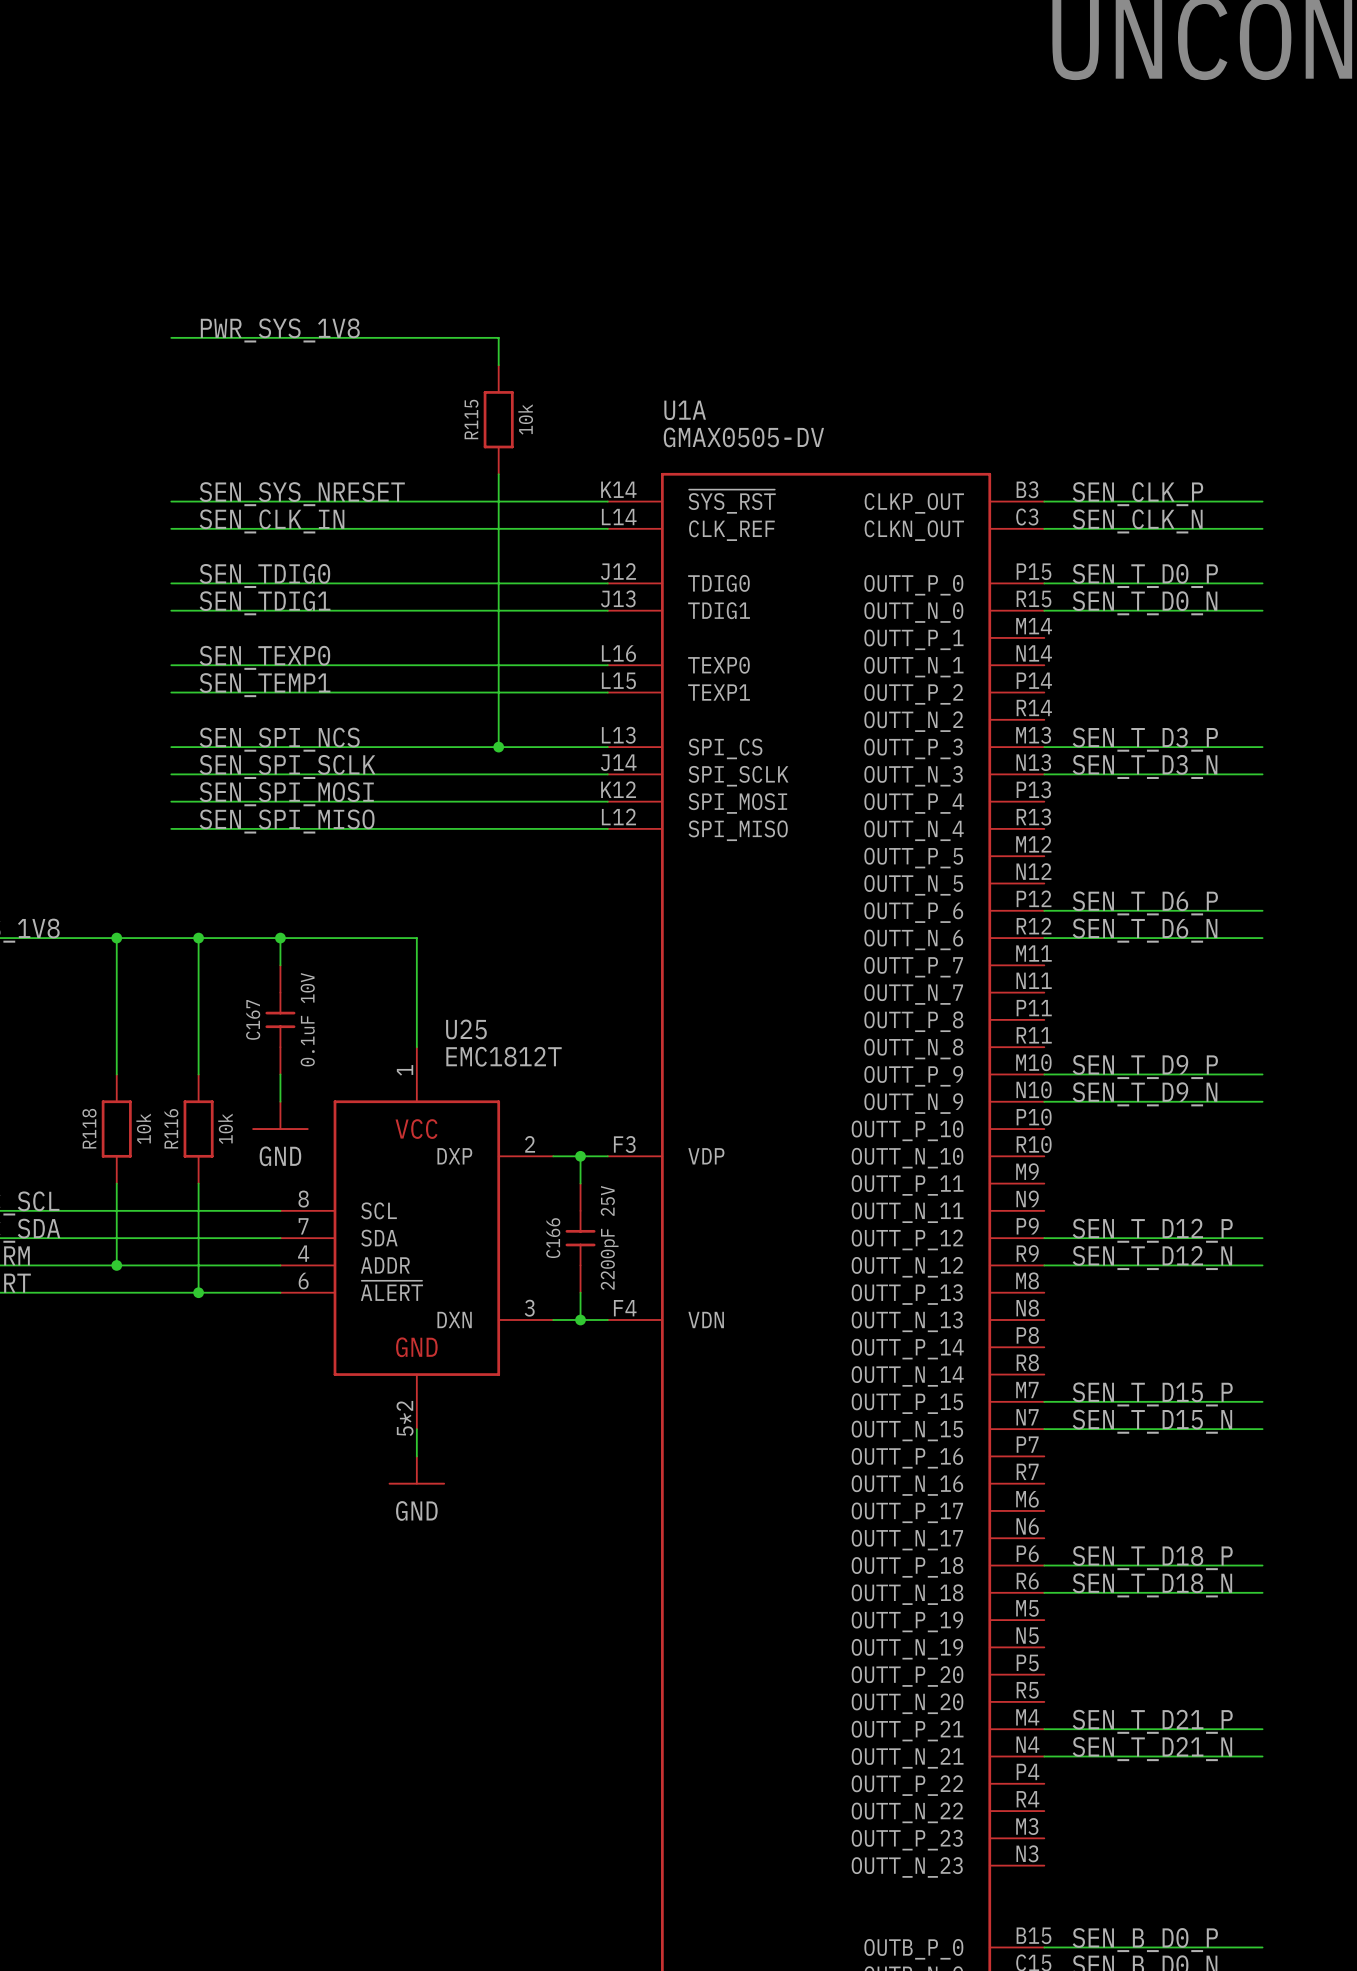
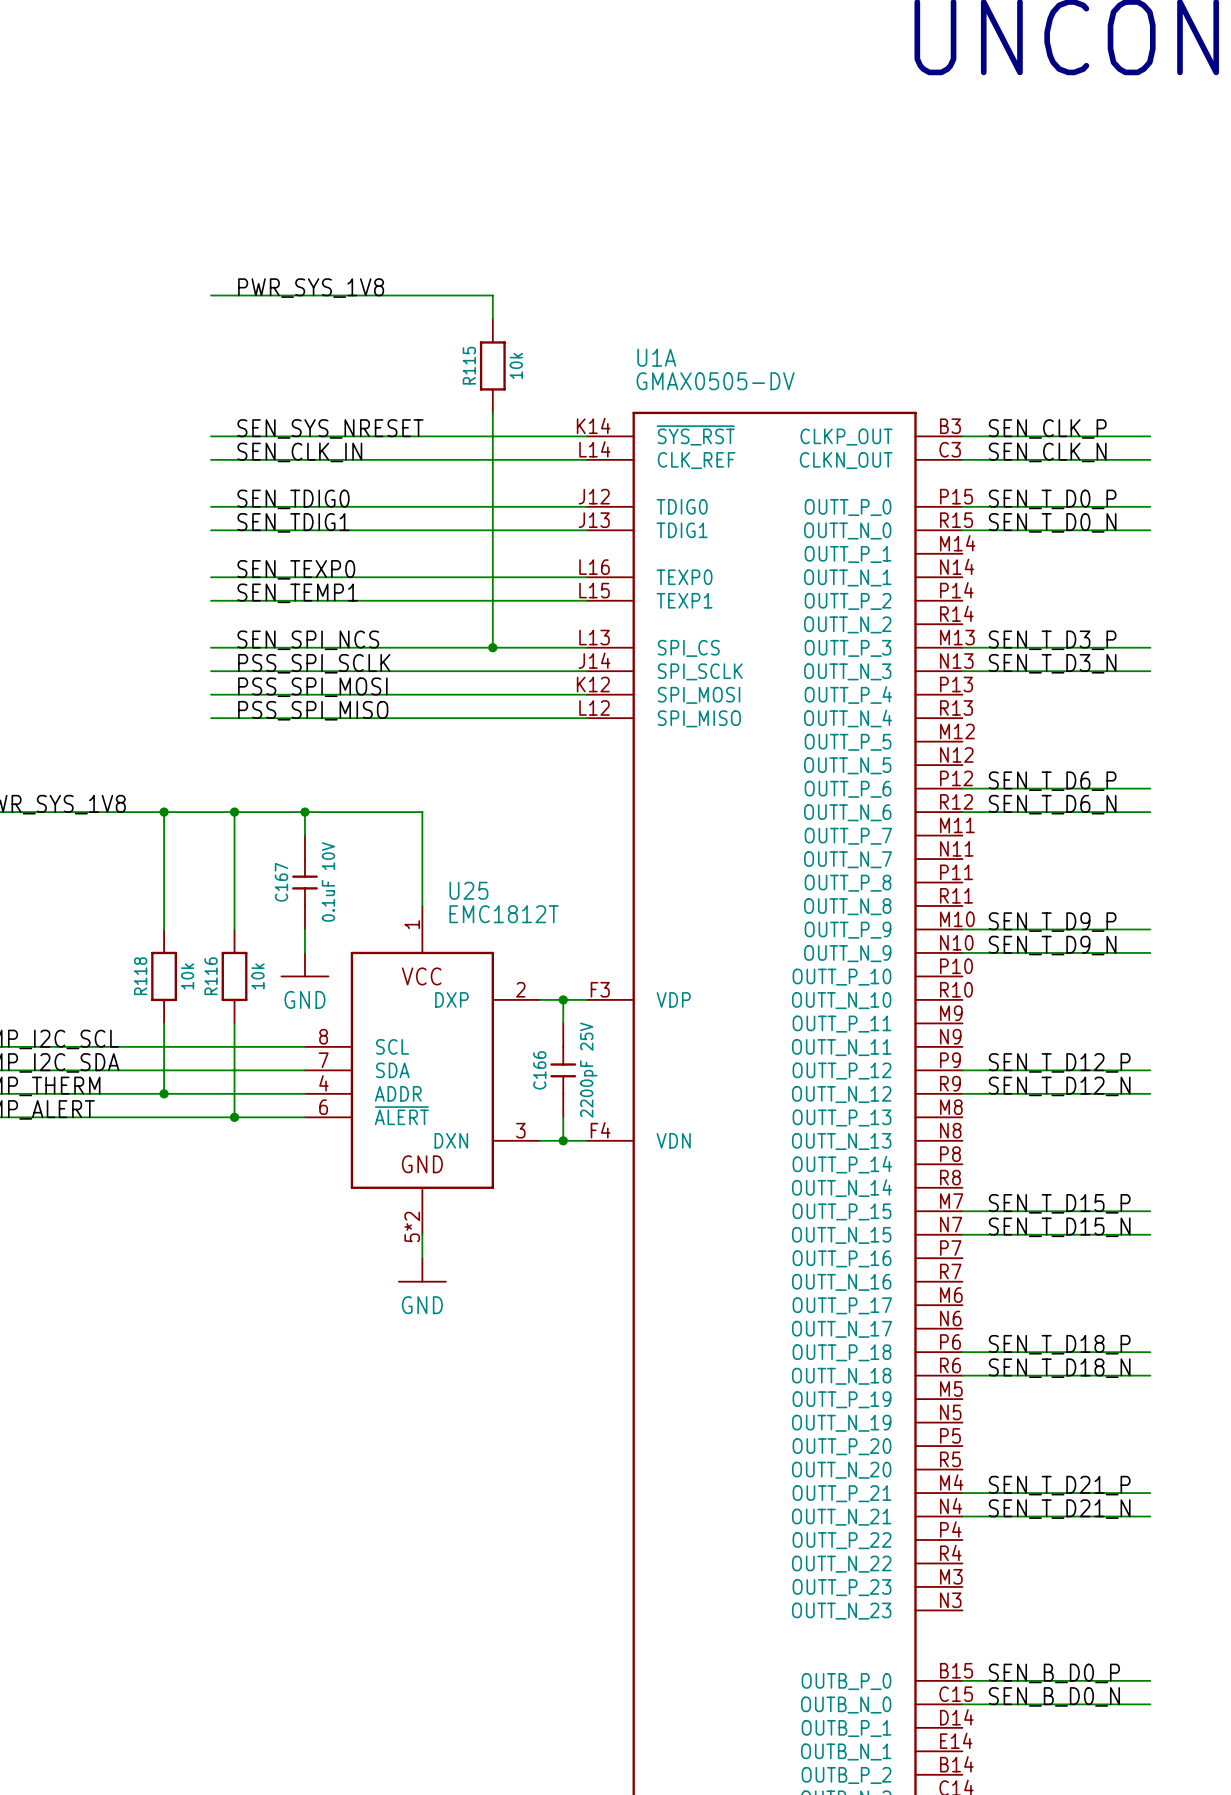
label: SEN_SPI_SCLK (287, 766) -> PSS_SPI_SCLK (314, 663)
label: SEN_SPI_MOSI (286, 794) -> PSS_SPI_MOSI (312, 687)
label: SEN_SPI_MISO (287, 821) -> PSS_SPI_MISO (313, 710)

